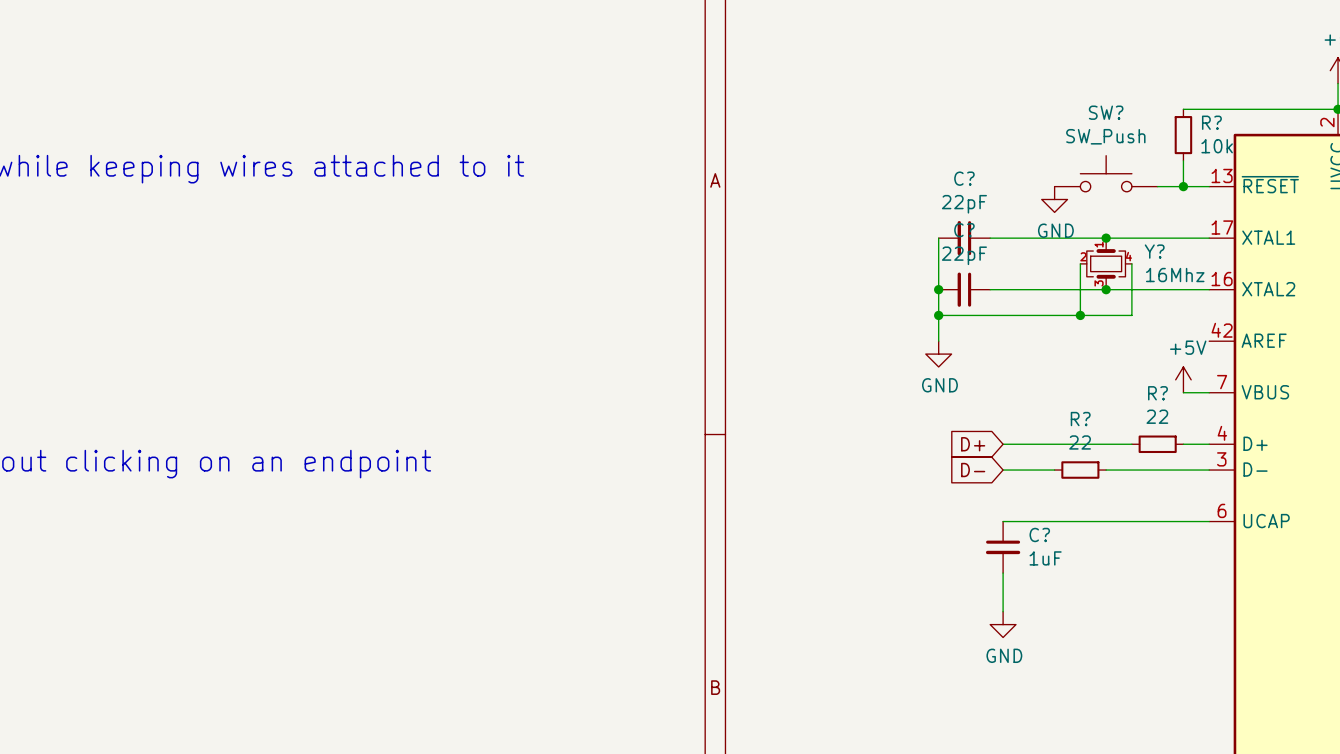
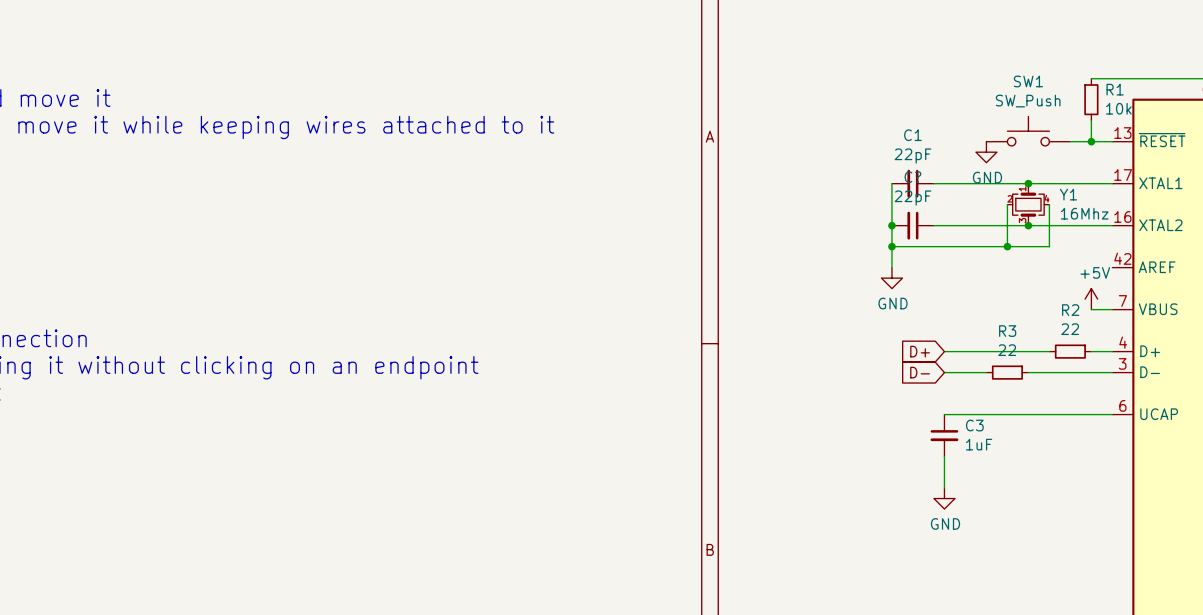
SW? name: SW? (1106, 112) -> SW1 (1028, 81)
R? name: R? (1211, 122) -> R1 (1115, 89)
C? name: C? (964, 178) -> C1 (912, 135)
Y? name: Y? (1154, 251) -> Y1 (1068, 194)
R? name: R? (1157, 393) -> R2 (1070, 310)
R? name: R? (1080, 419) -> R3 (1007, 331)
C? name: C? (1039, 534) -> C3 (974, 425)

